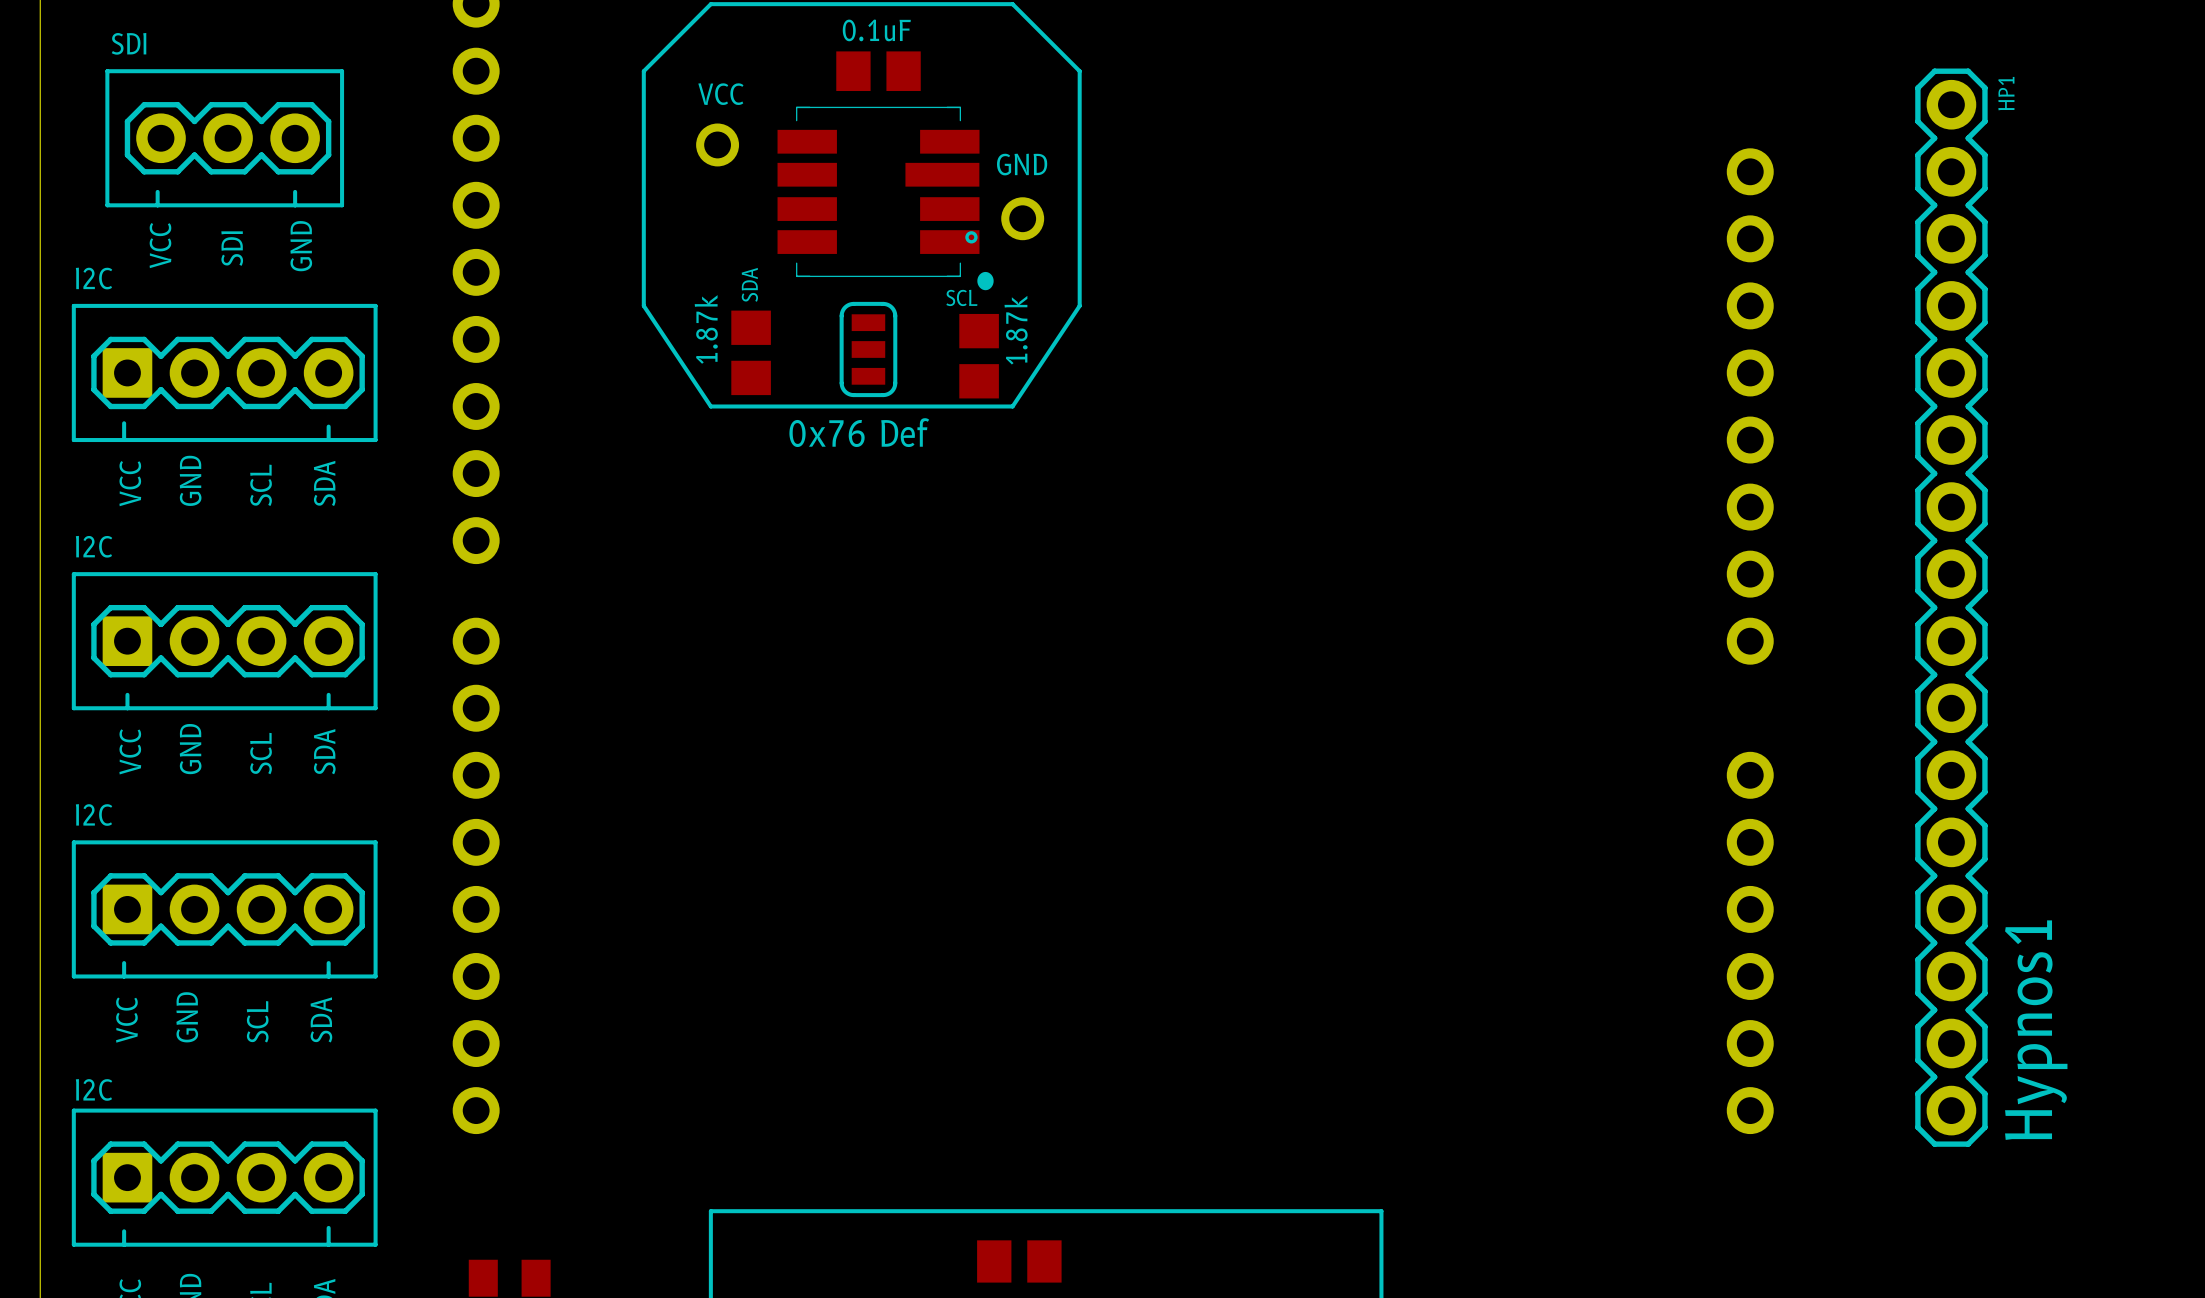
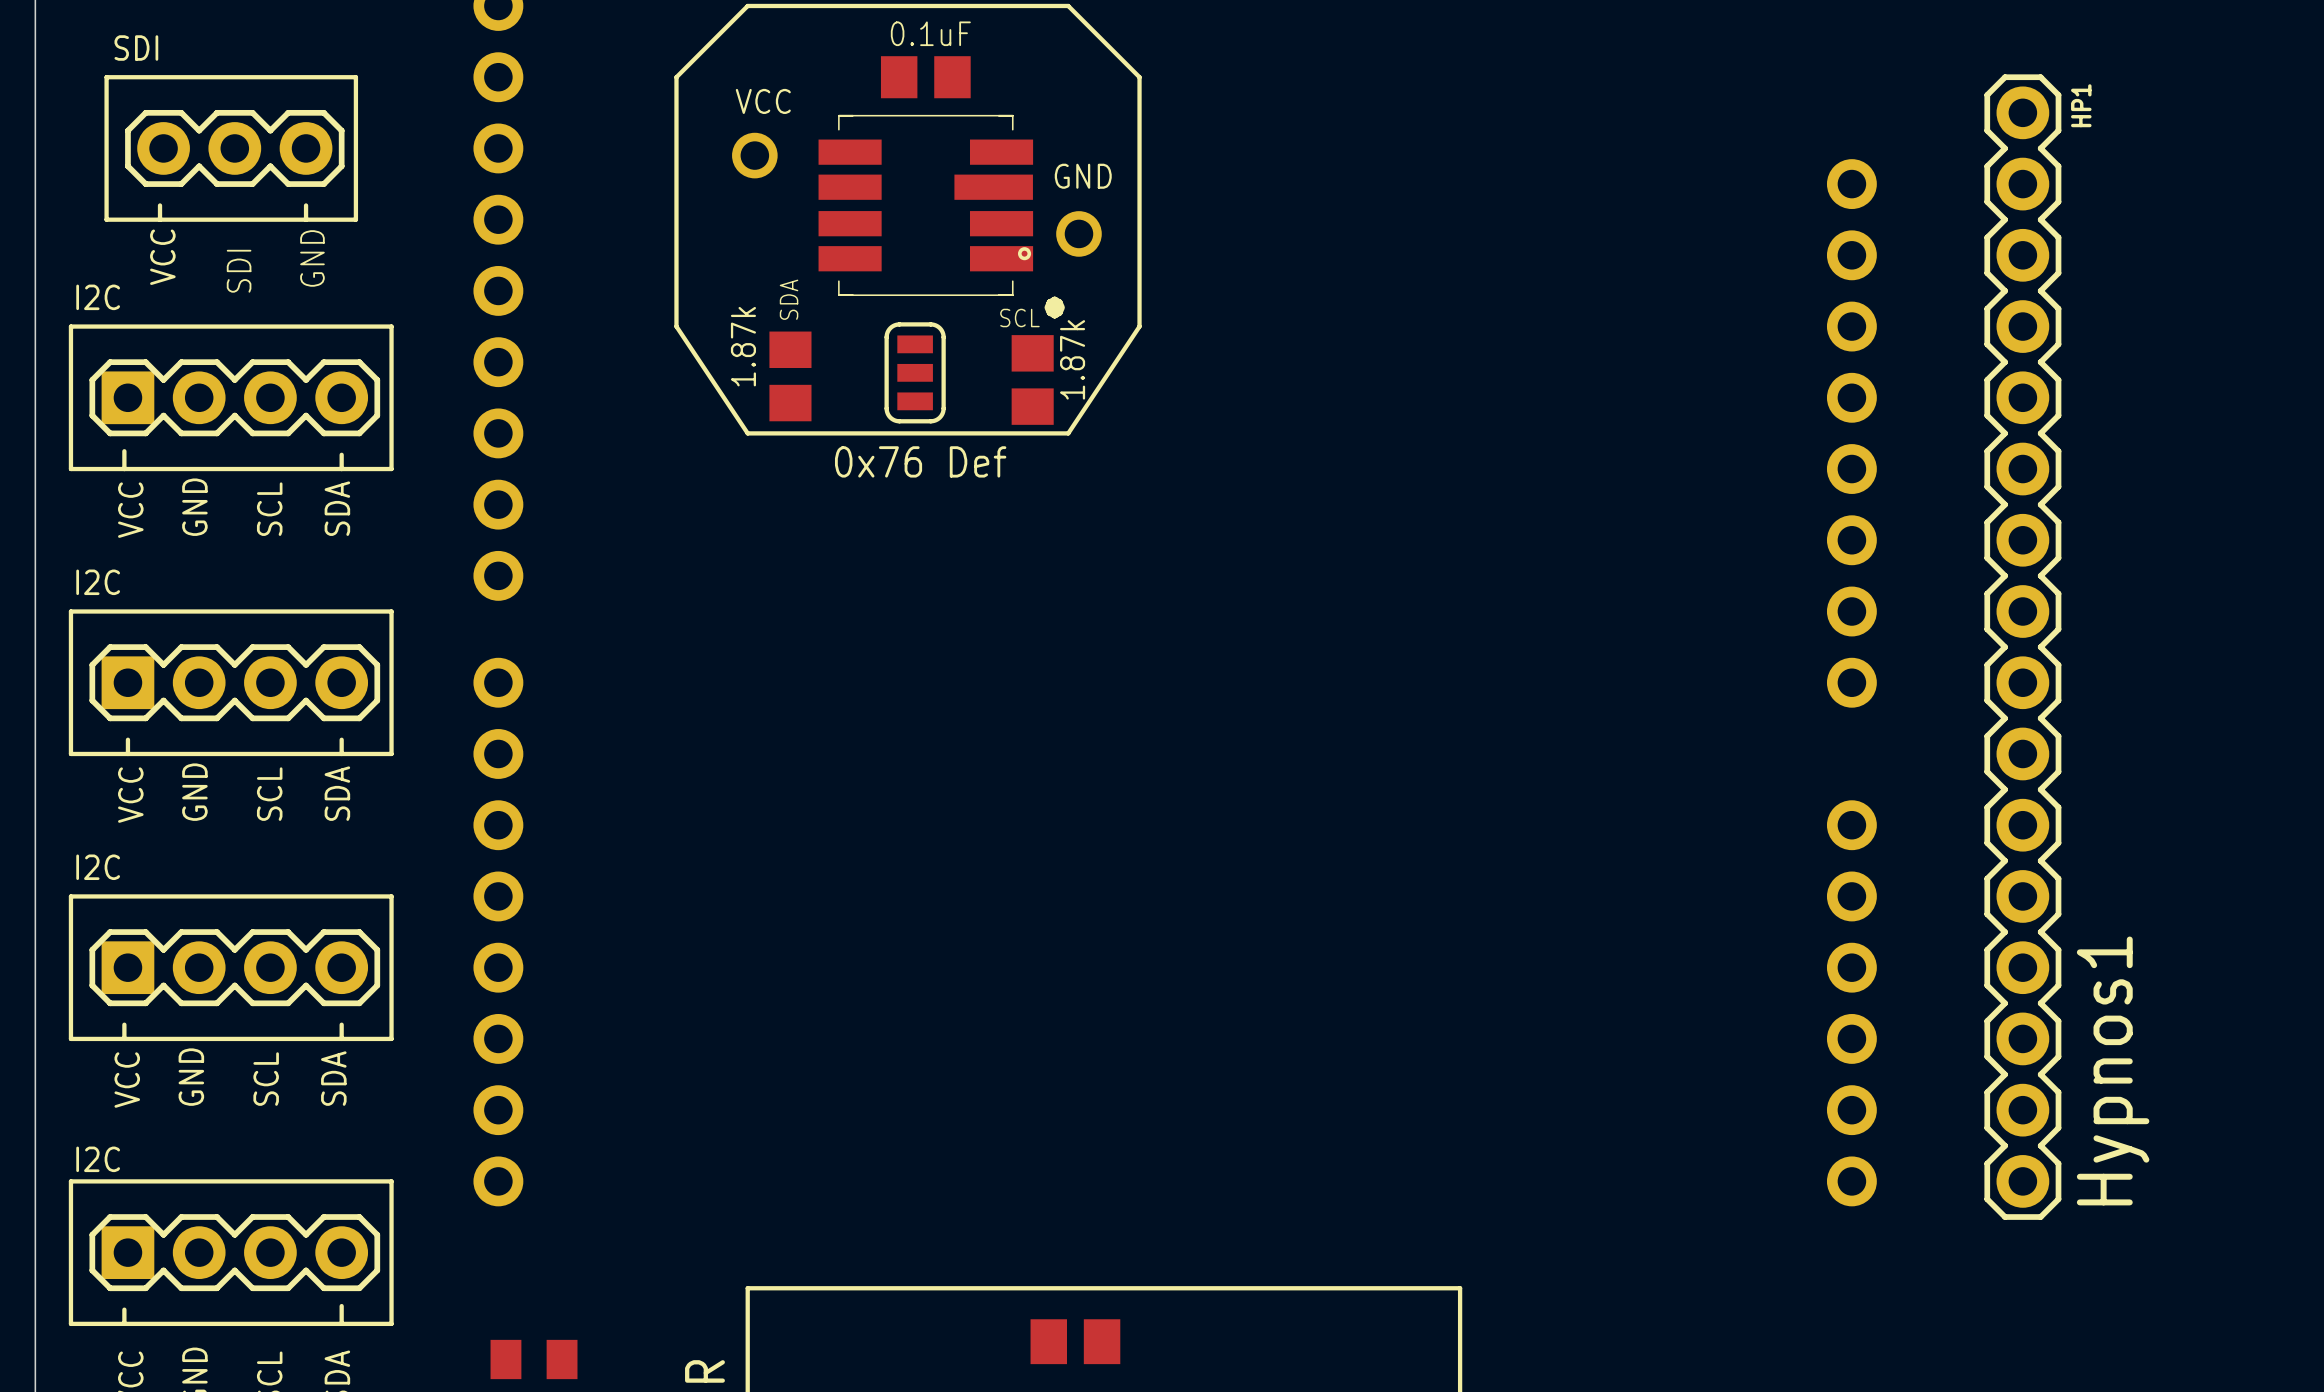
HP1 position: (1951, 607) -> (2022, 647)
text position: Hypnos1 (2036, 1030) -> Hypnos1 (2113, 1070)

